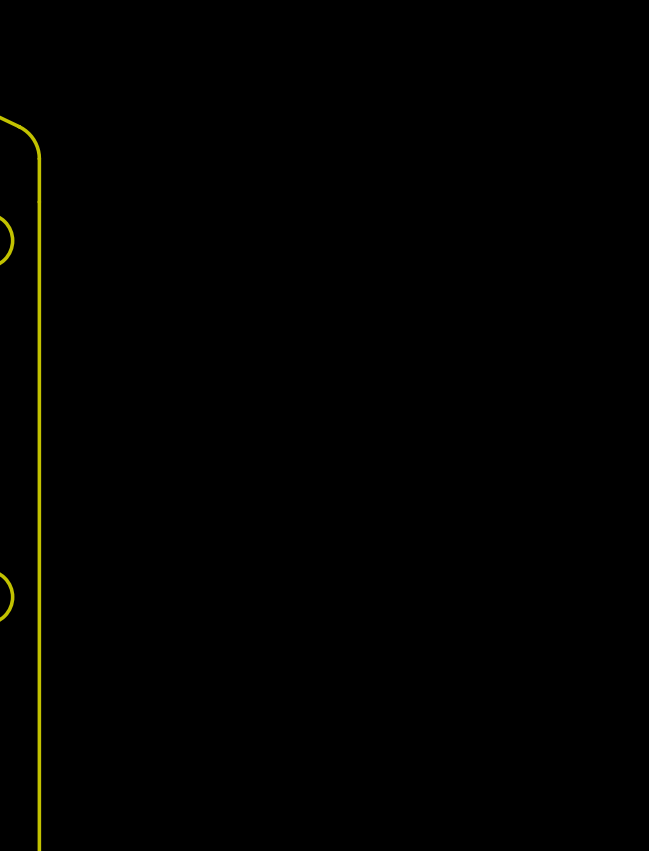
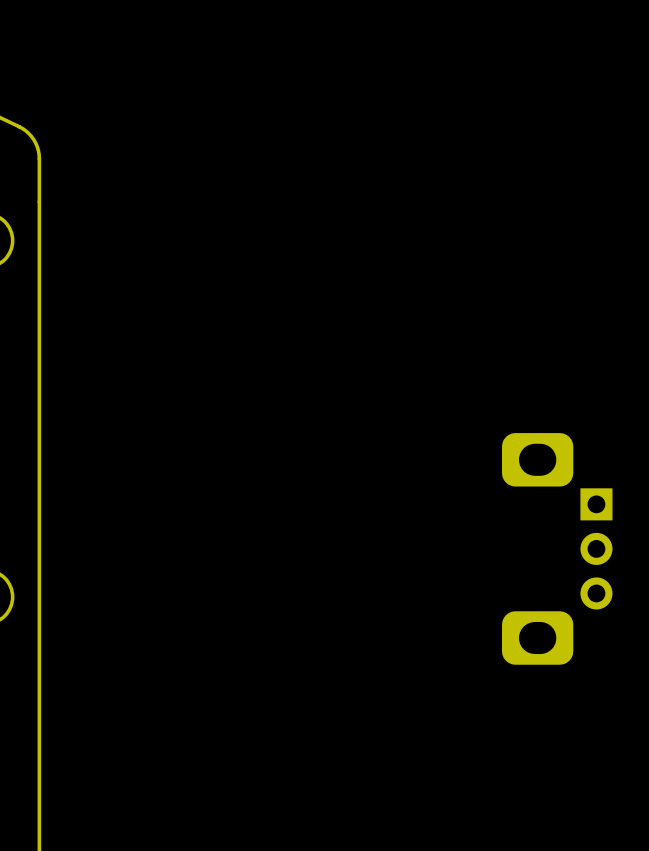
part: none -> (557, 548)

